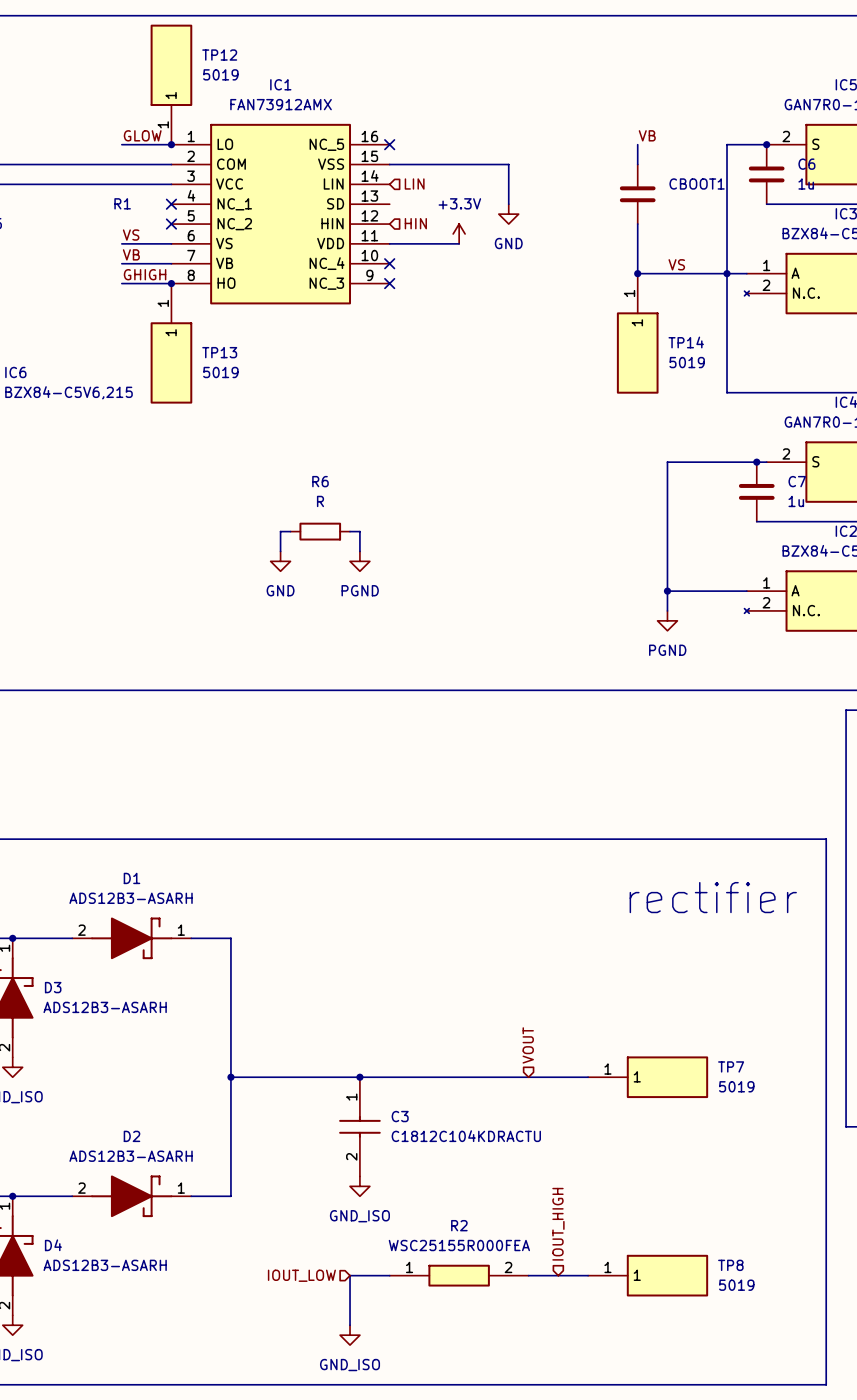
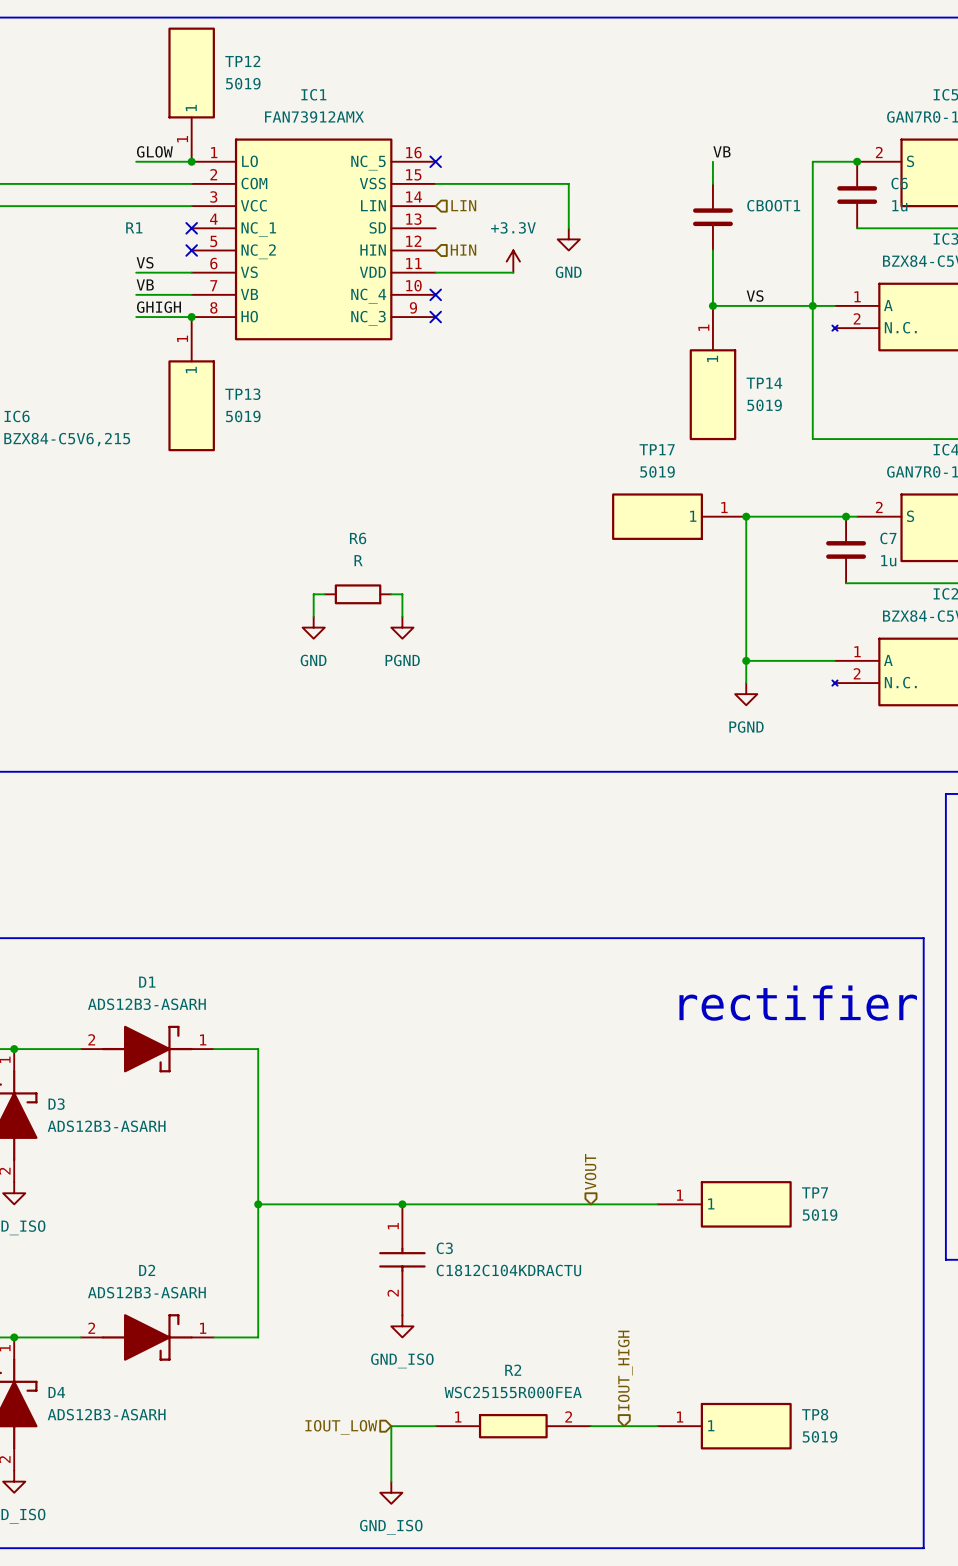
TP17: none -> 5019 (679, 516)
junction: none -> (746, 516)

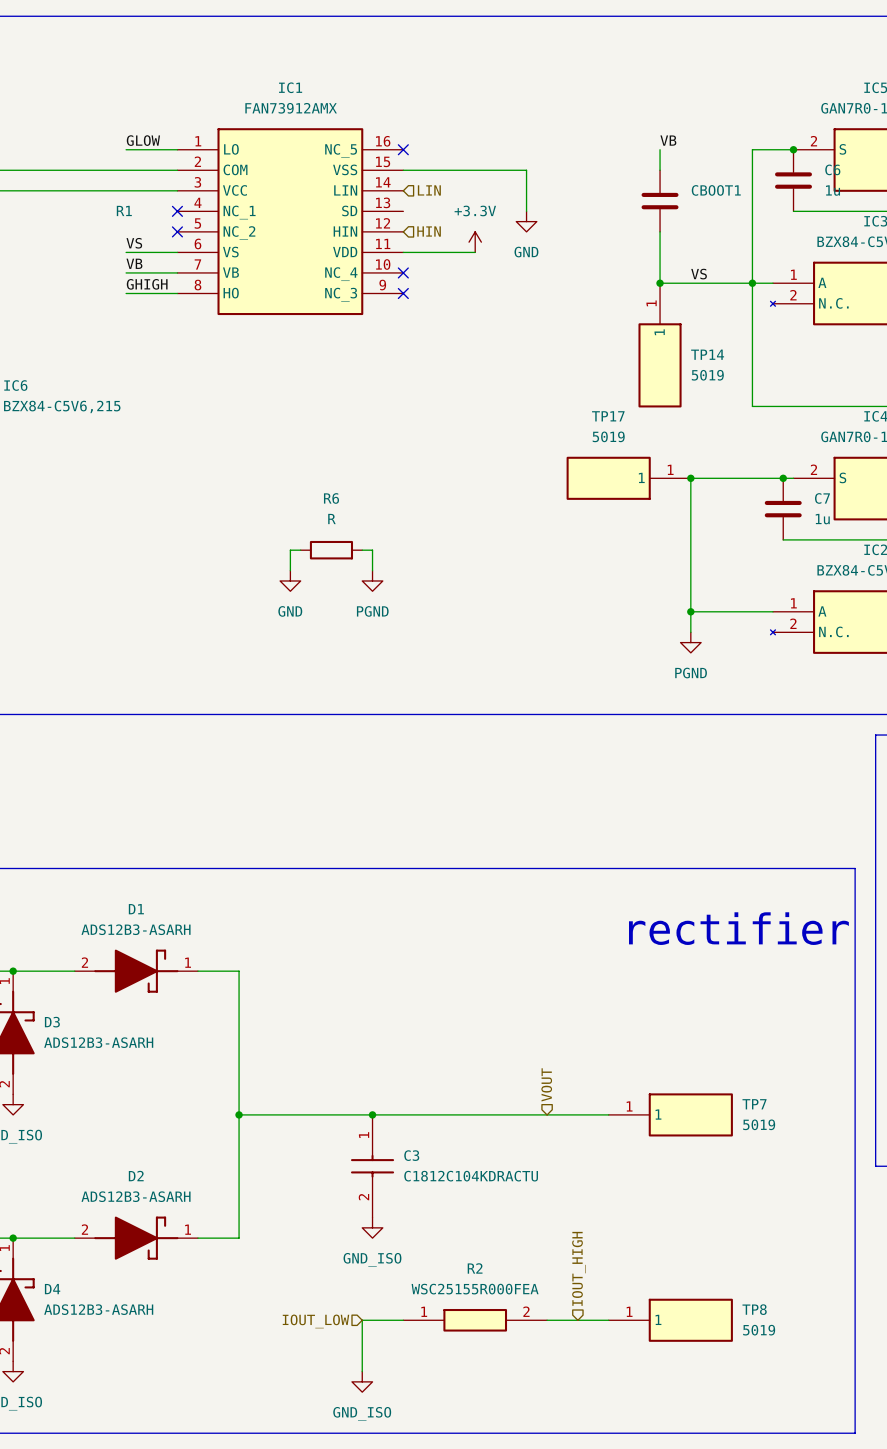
TP12: 5019 (191, 94) -> none
junction: (191, 161) -> none
junction: (191, 317) -> none
TP13: 5019 (191, 384) -> none

